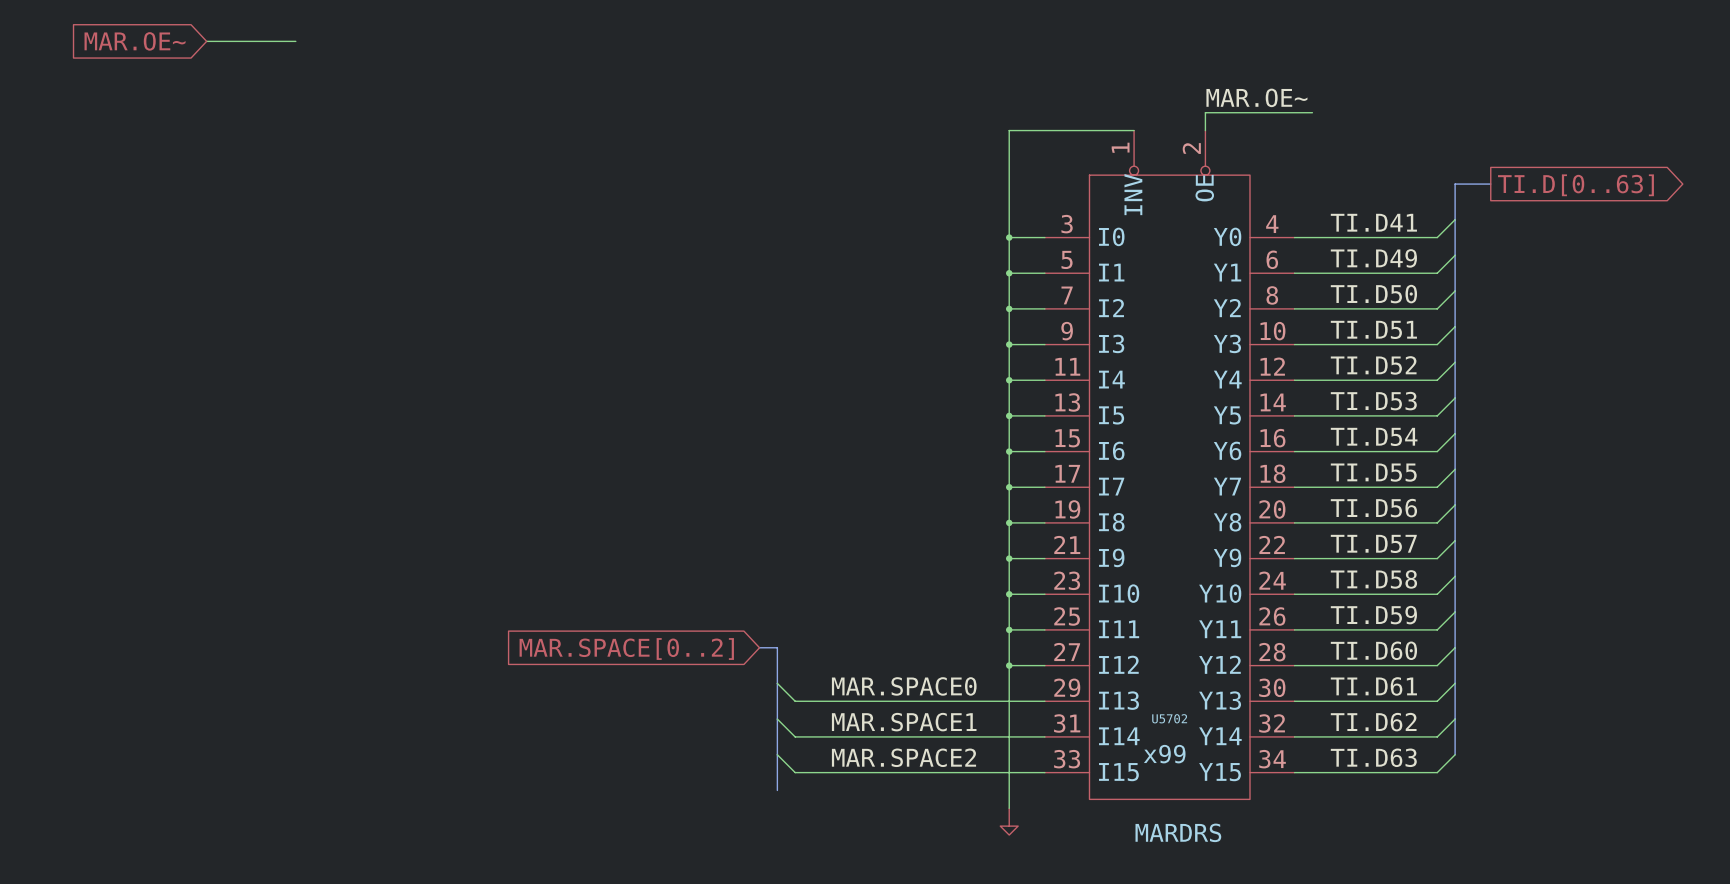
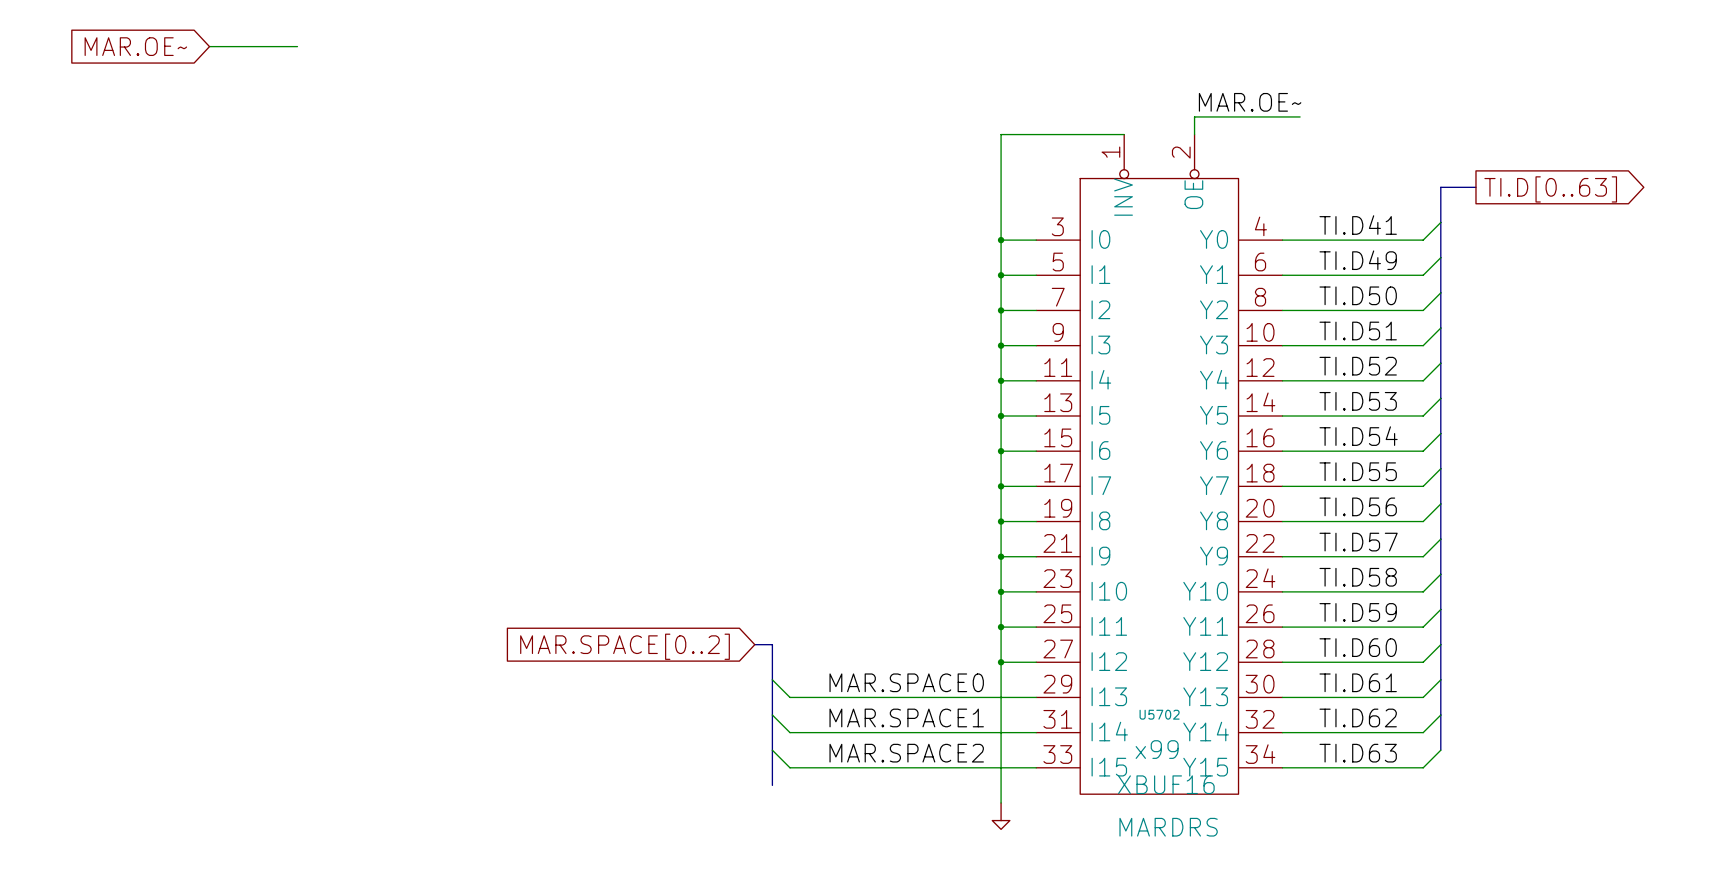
U5702 value: none -> XBUF16 (1166, 784)

